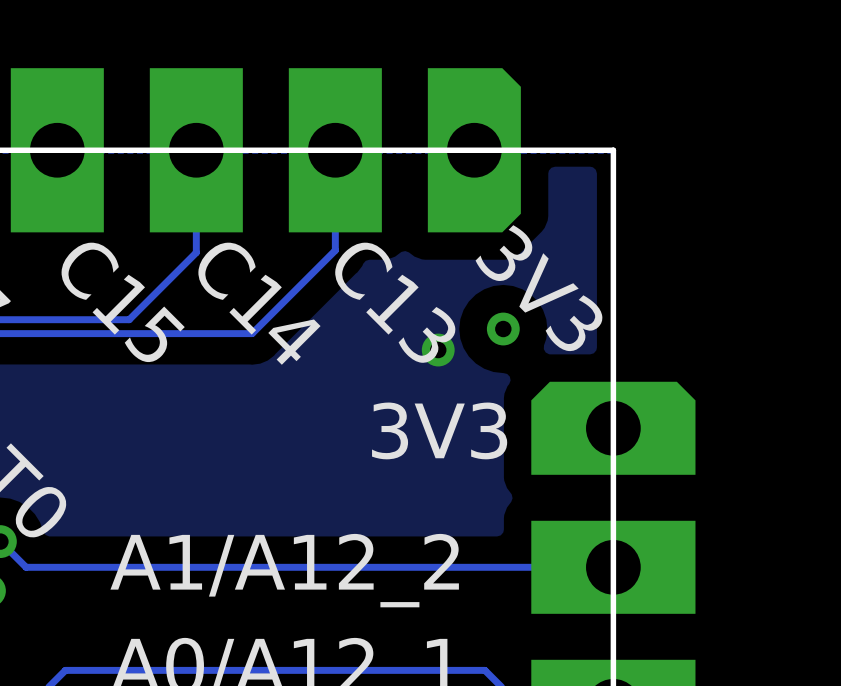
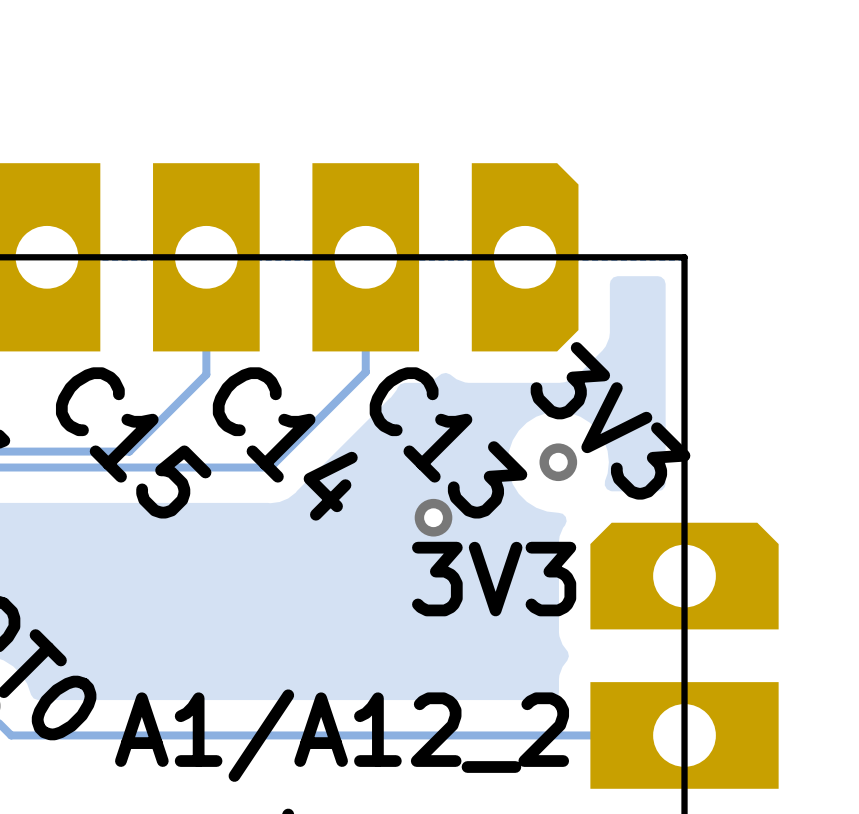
via position: (438, 350) -> (433, 517)

